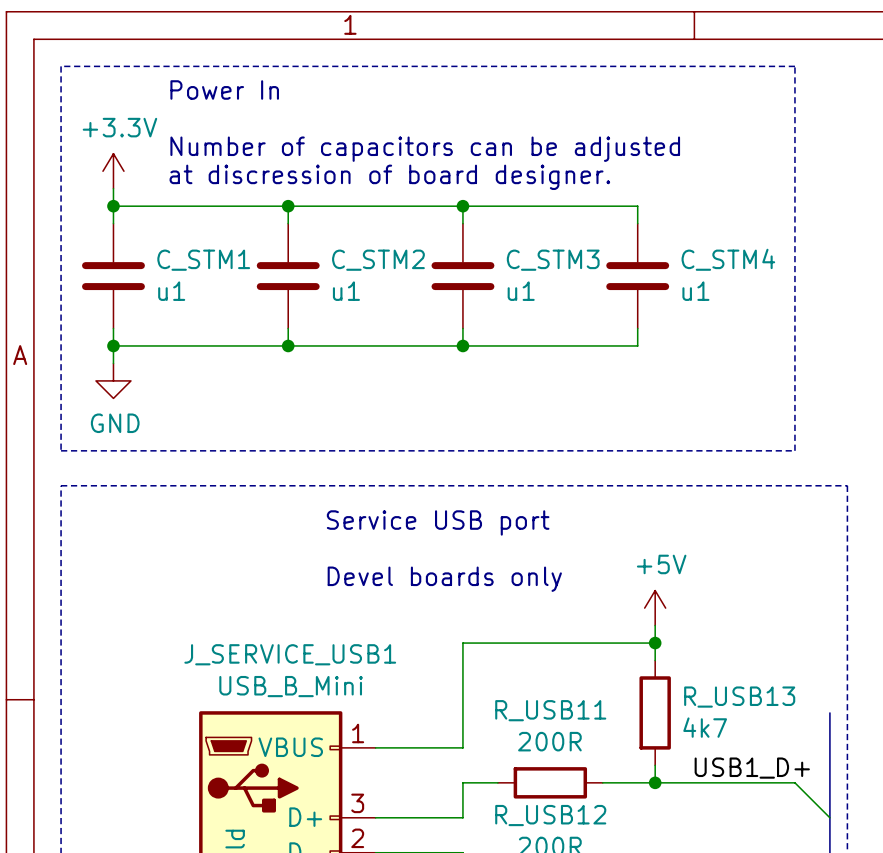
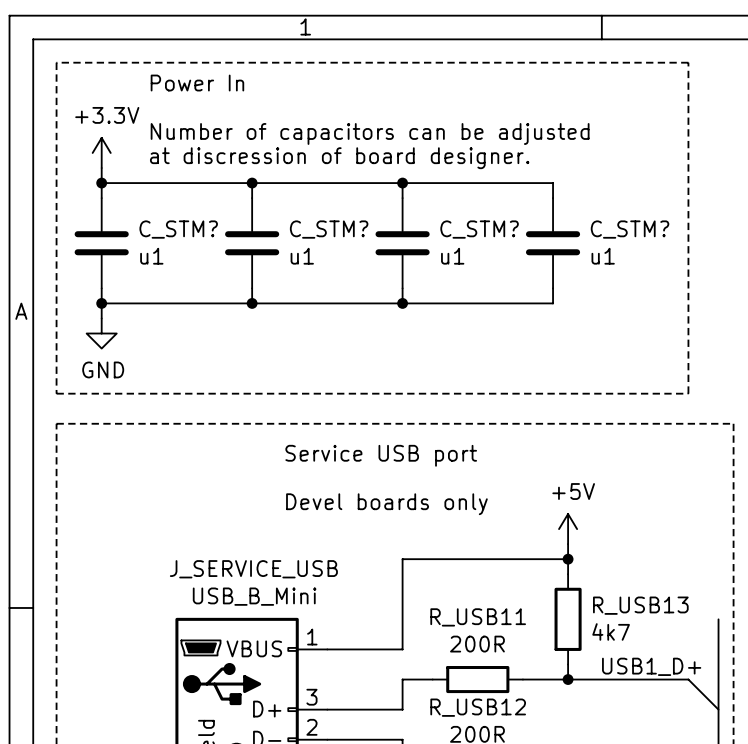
C_STM4 name: C_STM4 (728, 259) -> C_STM? (630, 229)
C_STM1 name: C_STM1 (203, 260) -> C_STM? (178, 229)
C_STM2 name: C_STM2 (378, 260) -> C_STM? (329, 229)
C_STM3 name: C_STM3 (553, 260) -> C_STM? (479, 229)
J_SERVICE_USB1 name: J_SERVICE_USB1 (290, 654) -> J_SERVICE_USB (253, 569)

